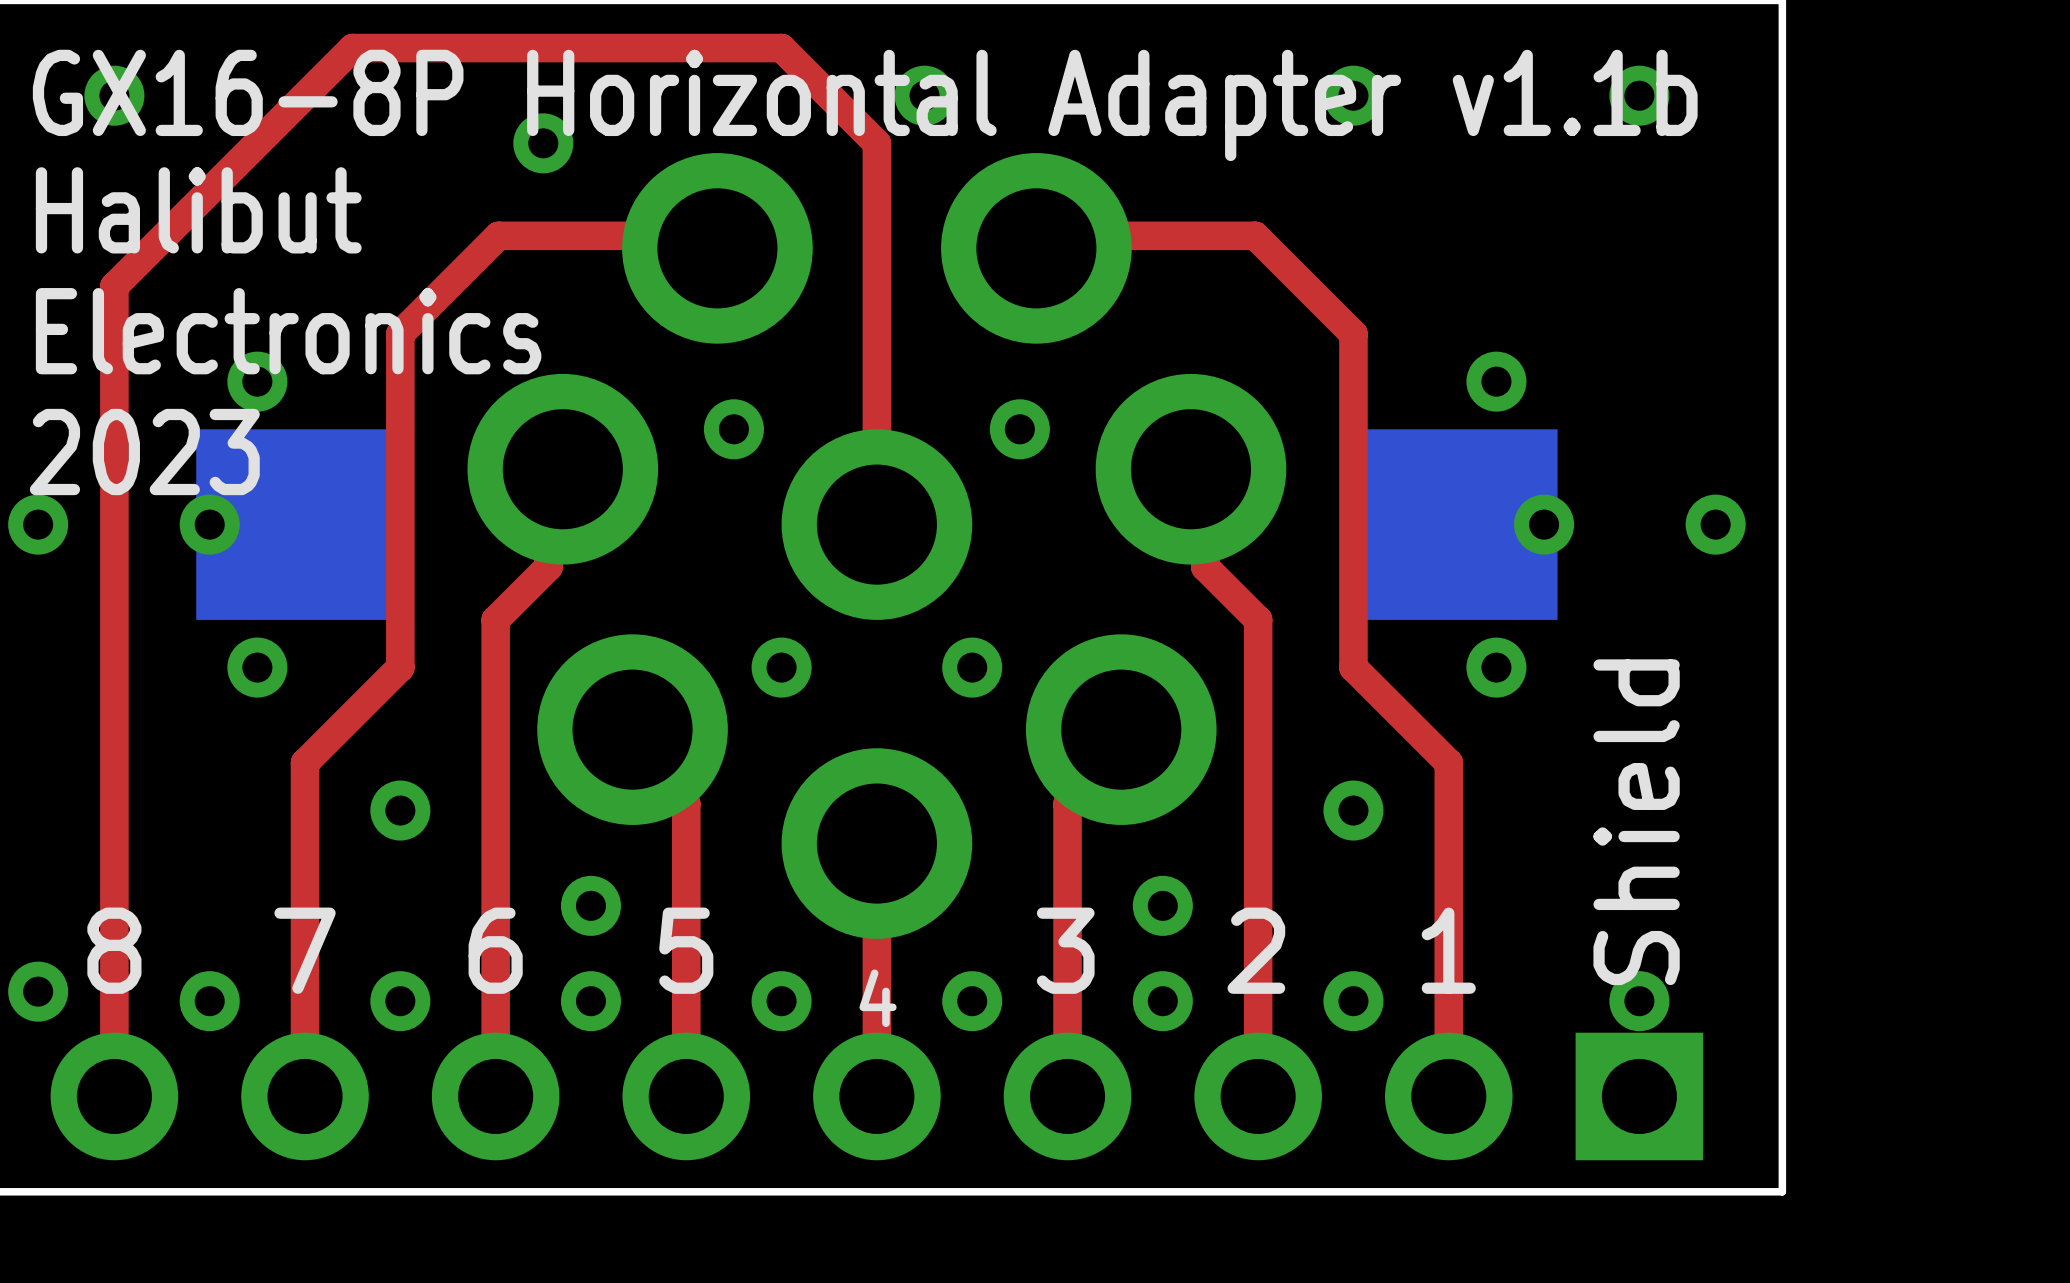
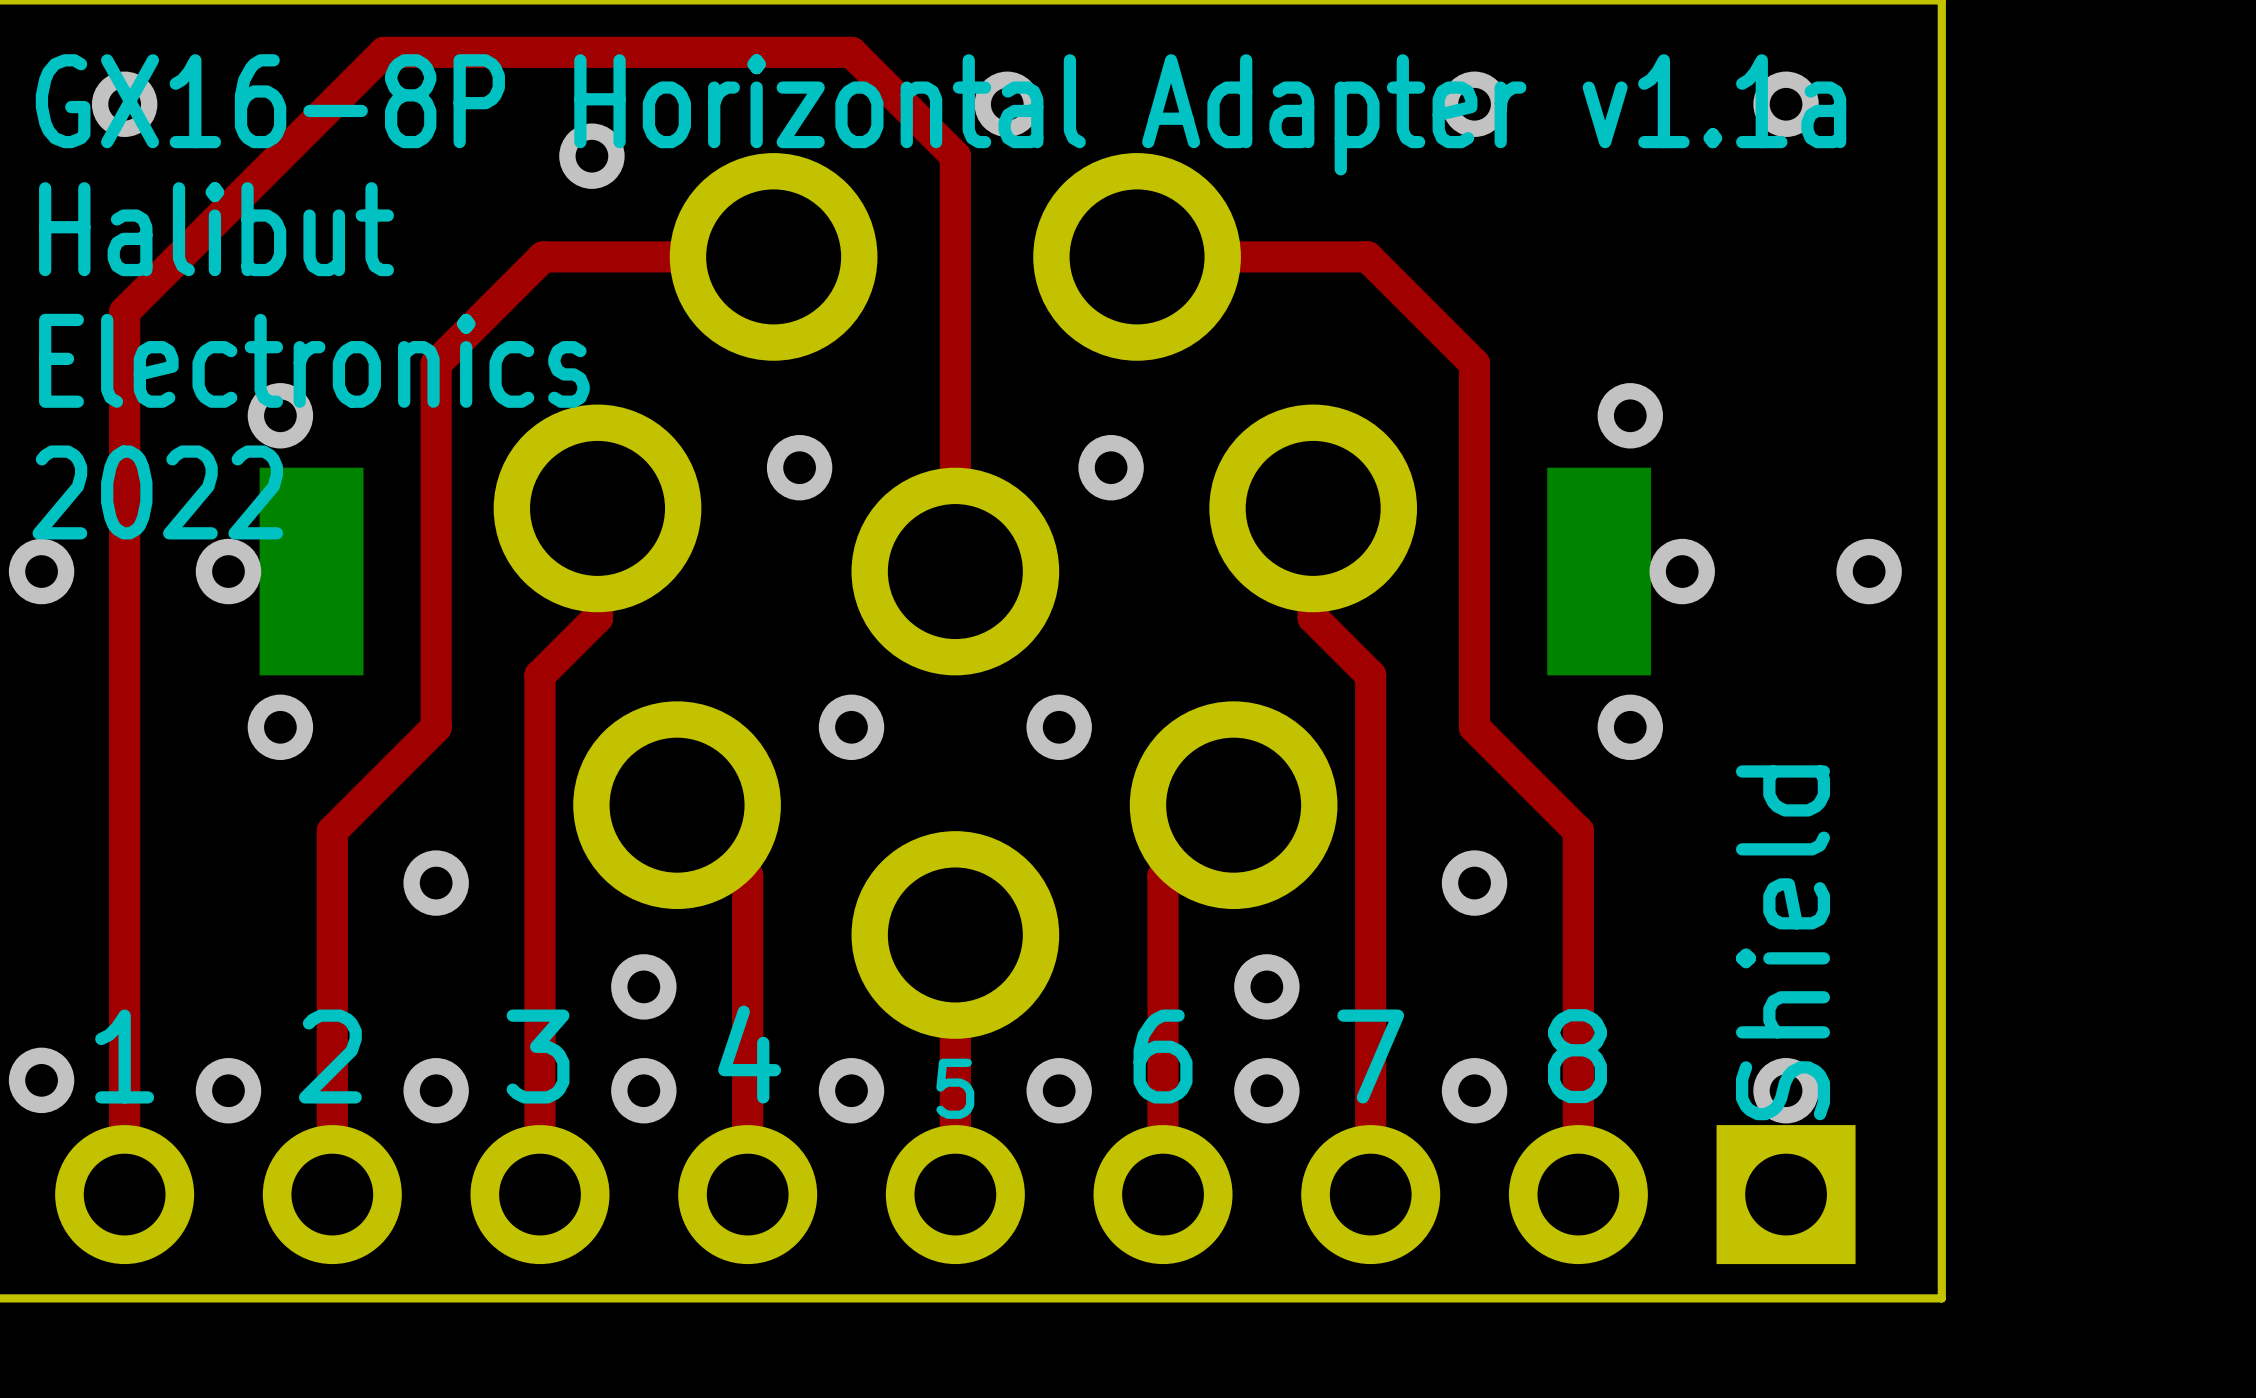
text: GX16-8P Horizontal Adapter v1.1b (865, 105) -> GX16-8P Horizontal Adapter v1.1a (941, 114)
part footprint: [196, 153, 1558, 939] -> [259, 153, 1652, 1039]
text: 2023 (144, 452) -> 2022 (157, 492)
text position: Shield (1636, 822) -> Shield (1783, 942)
text position: 8 (114, 950) -> 8 (1577, 1056)
text position: 7 (305, 950) -> 7 (1370, 1056)
text position: 6 (495, 950) -> 6 (1163, 1056)
text: 5 (686, 950) -> 4 (749, 1054)
text position: 3 (1065, 950) -> 3 (538, 1056)
text position: 2 (1256, 950) -> 2 (330, 1056)
text position: 1 (1448, 950) -> 1 (124, 1056)
text: 4 (878, 998) -> 5 (955, 1088)

